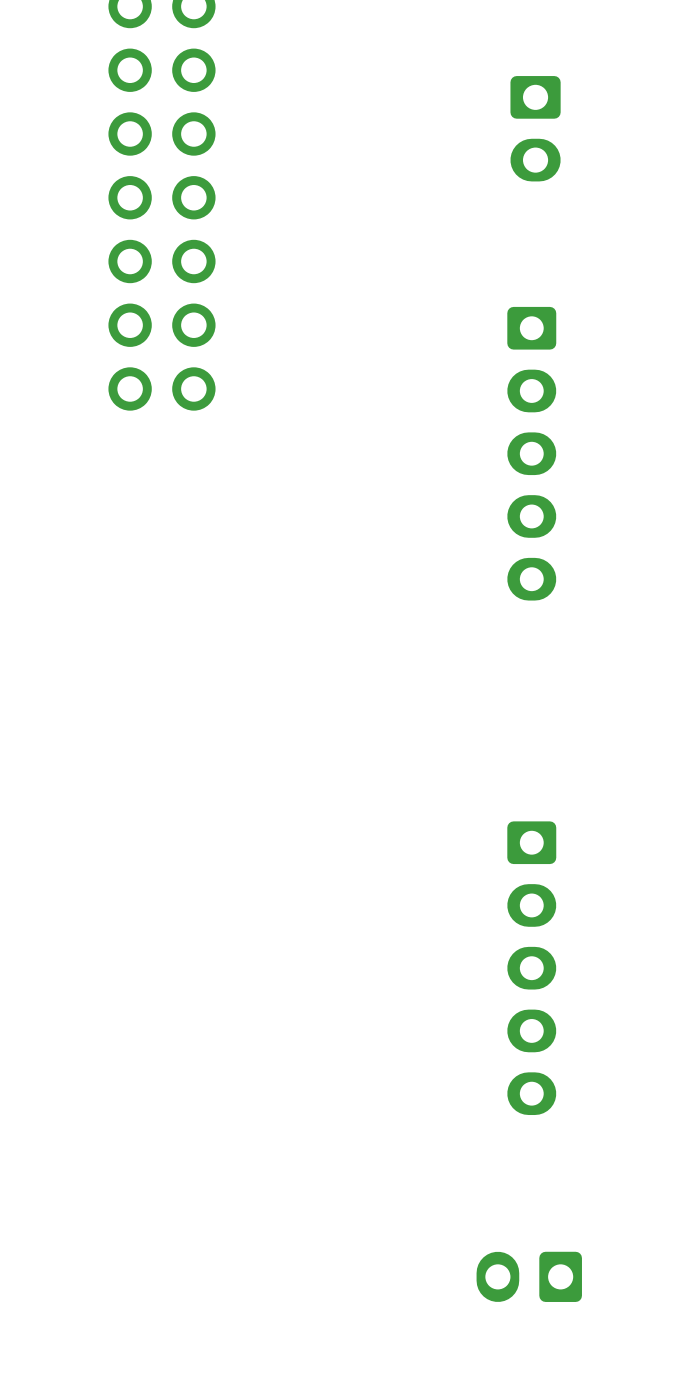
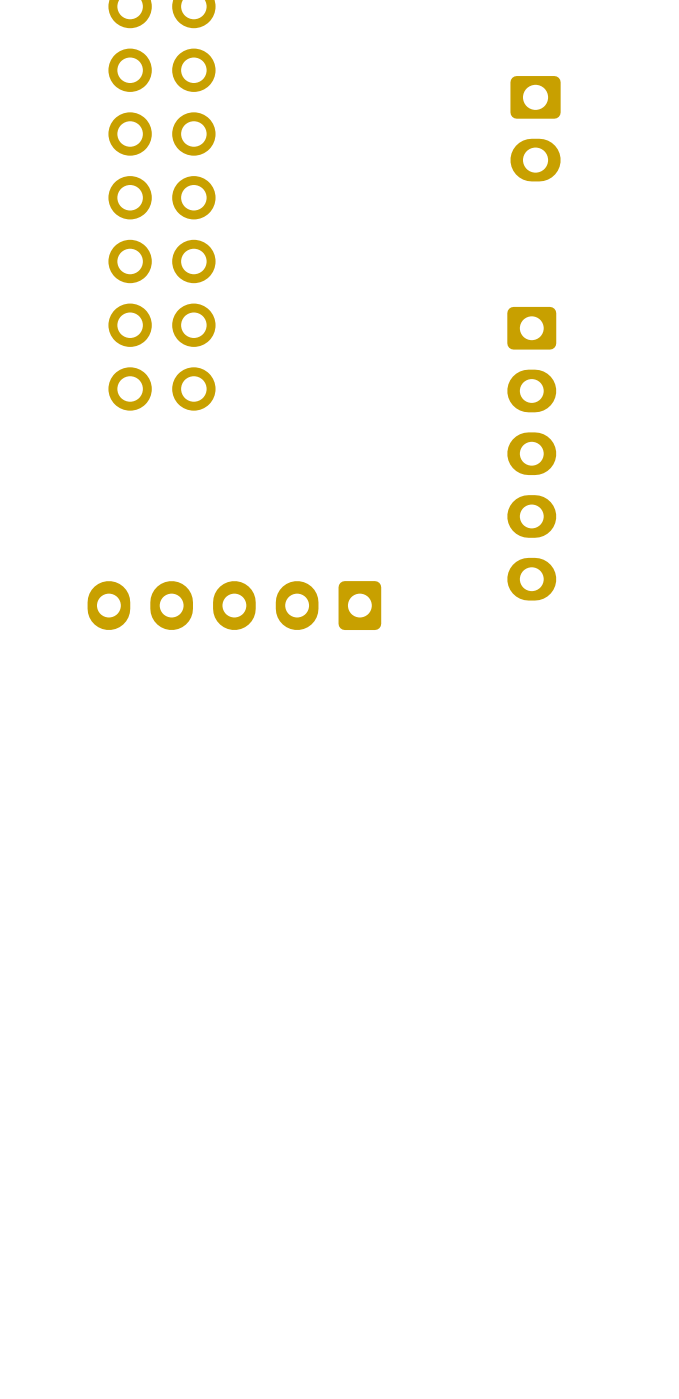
part rotation: 0° (531, 968) -> 90° clockwise (234, 605)
part position: (531, 968) -> (234, 605)
part: (529, 1276) -> none

